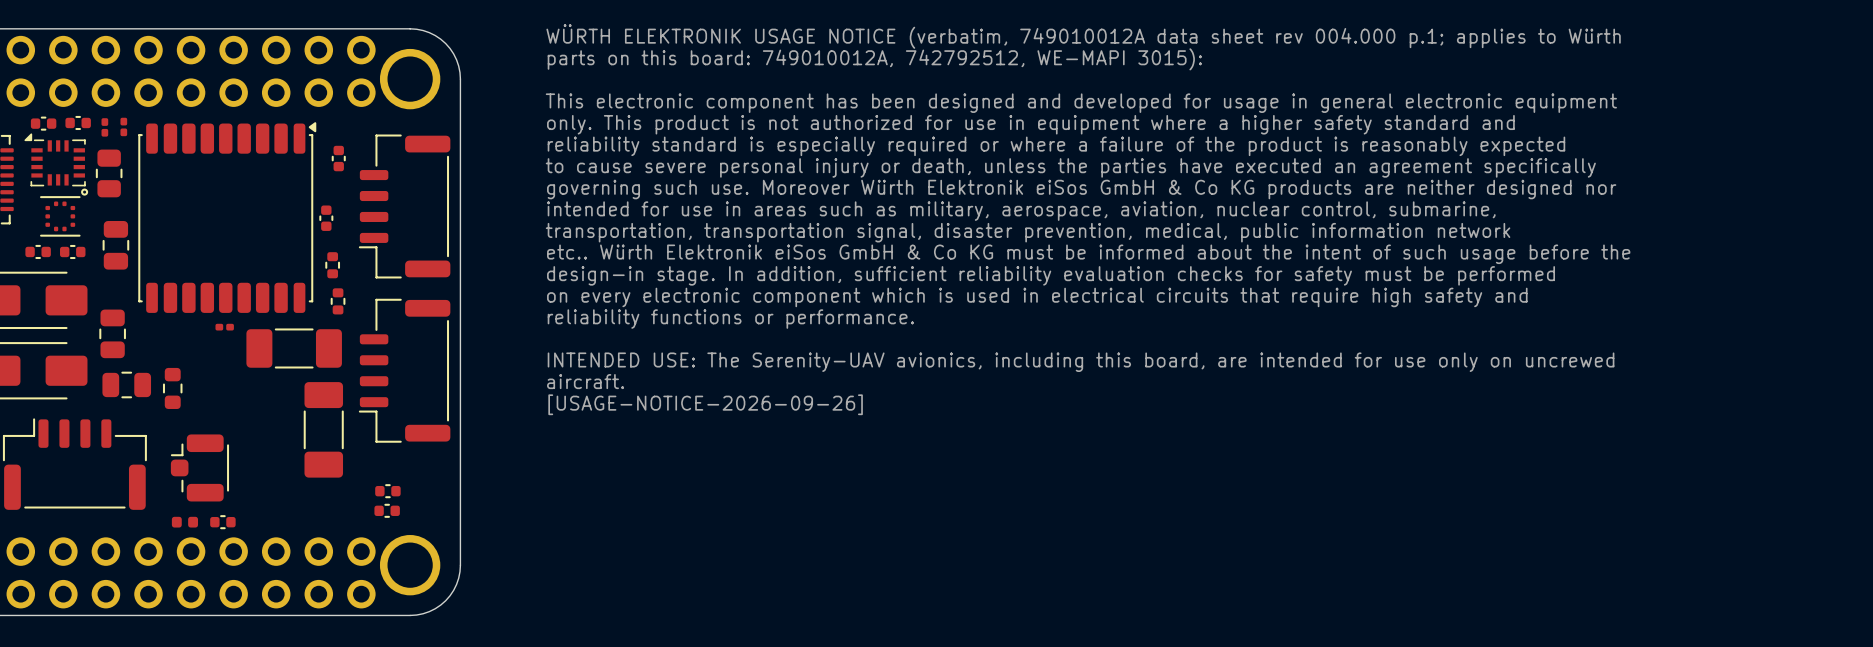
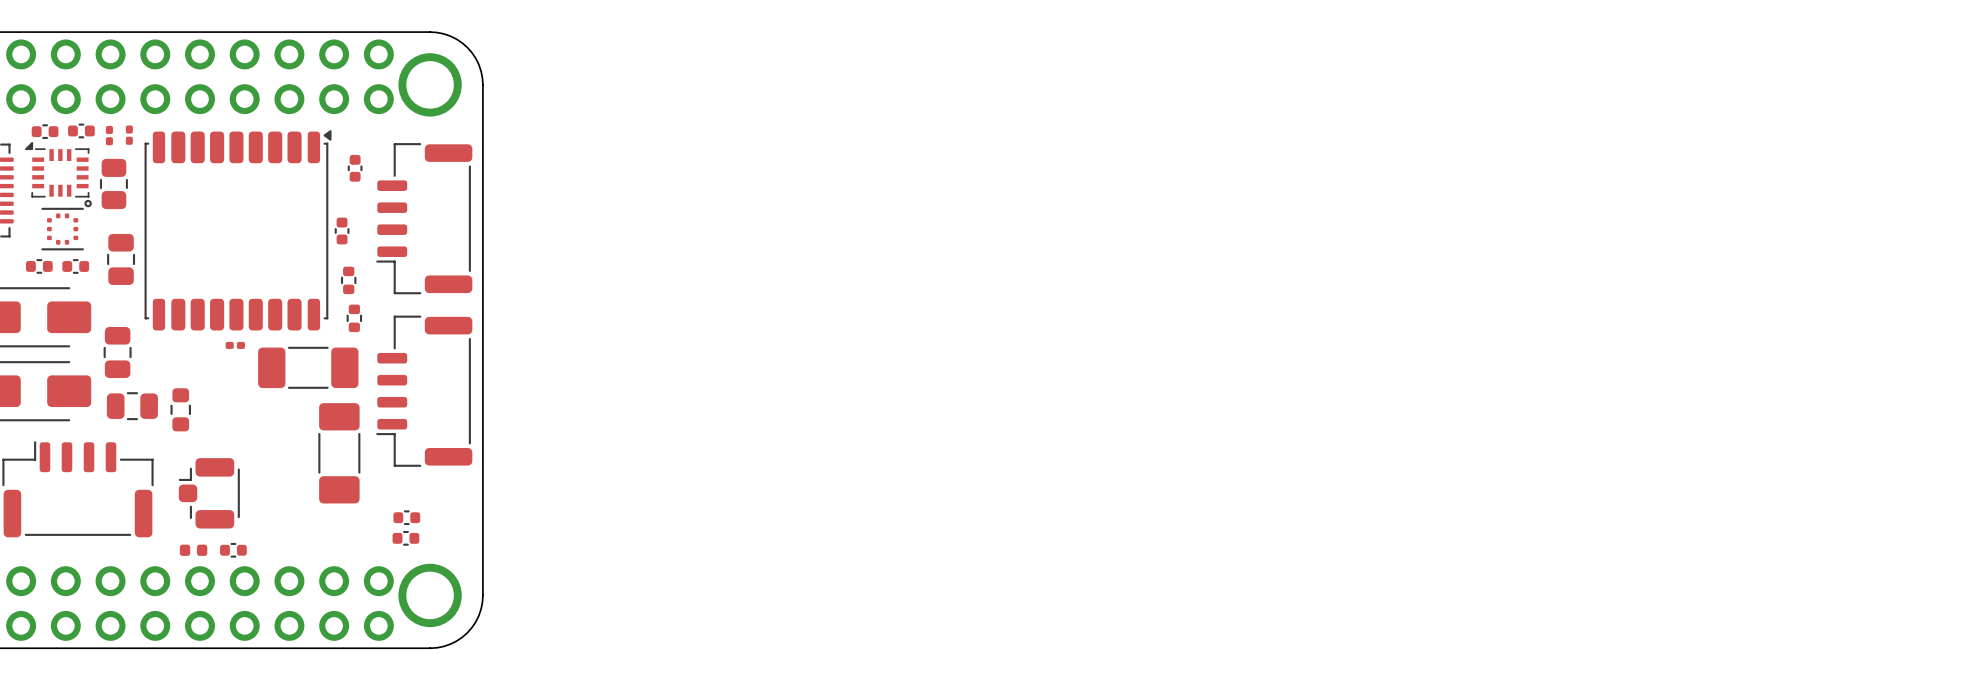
text: WÜRTH ELEKTRONIK USAGE NOTICE (verbatim, 749010012A data sheet rev 004.000 p.1; applies to Würth (1083, 36) -> none
text: parts on this board: 749010012A, 742792512, WE-MAPI 3015): (874, 59) -> none
text: This electronic component has been designed and developed for usage in general electronic equipment (1081, 103) -> none
text: only. This product is not authorized for use in equipment where a higher safety standard and (1030, 124) -> none
text: reliability standard is especially required or where a failure of the product is reasonably expected (1056, 146) -> none
text: to cause severe personal injury or death, unless the parties have executed an agreement specifically (1070, 167) -> none
text: governing such use. Moreover Würth Elektronik eiSos GmbH & Co KG products are neither designed nor (1081, 189) -> none
text: intended for use in areas such as military, aerospace, aviation, nuclear control, submarine, (1021, 211) -> none
text: transportation, transportation signal, disaster prevention, medical, public information network (1028, 232) -> none
text: etc.. Würth Elektronik eiSos GmbH & Co KG must be informed about the intent of such usage before the (1088, 254) -> none
text: design-in stage. In addition, sufficient reliability evaluation checks for safety must be performed (1051, 275) -> none
text: on every electronic component which is used in electrical circuits that require high safety and (1037, 297) -> none
text: reliability functions or performance. (730, 319) -> none
text: INTENDED USE: The Serenity-UAV avionics, including this board, are intended for use only on uncrewed (1081, 362) -> none
text: aircraft. (585, 381) -> none
text: [USAGE-NOTICE-2026-09-26] (705, 404) -> none

